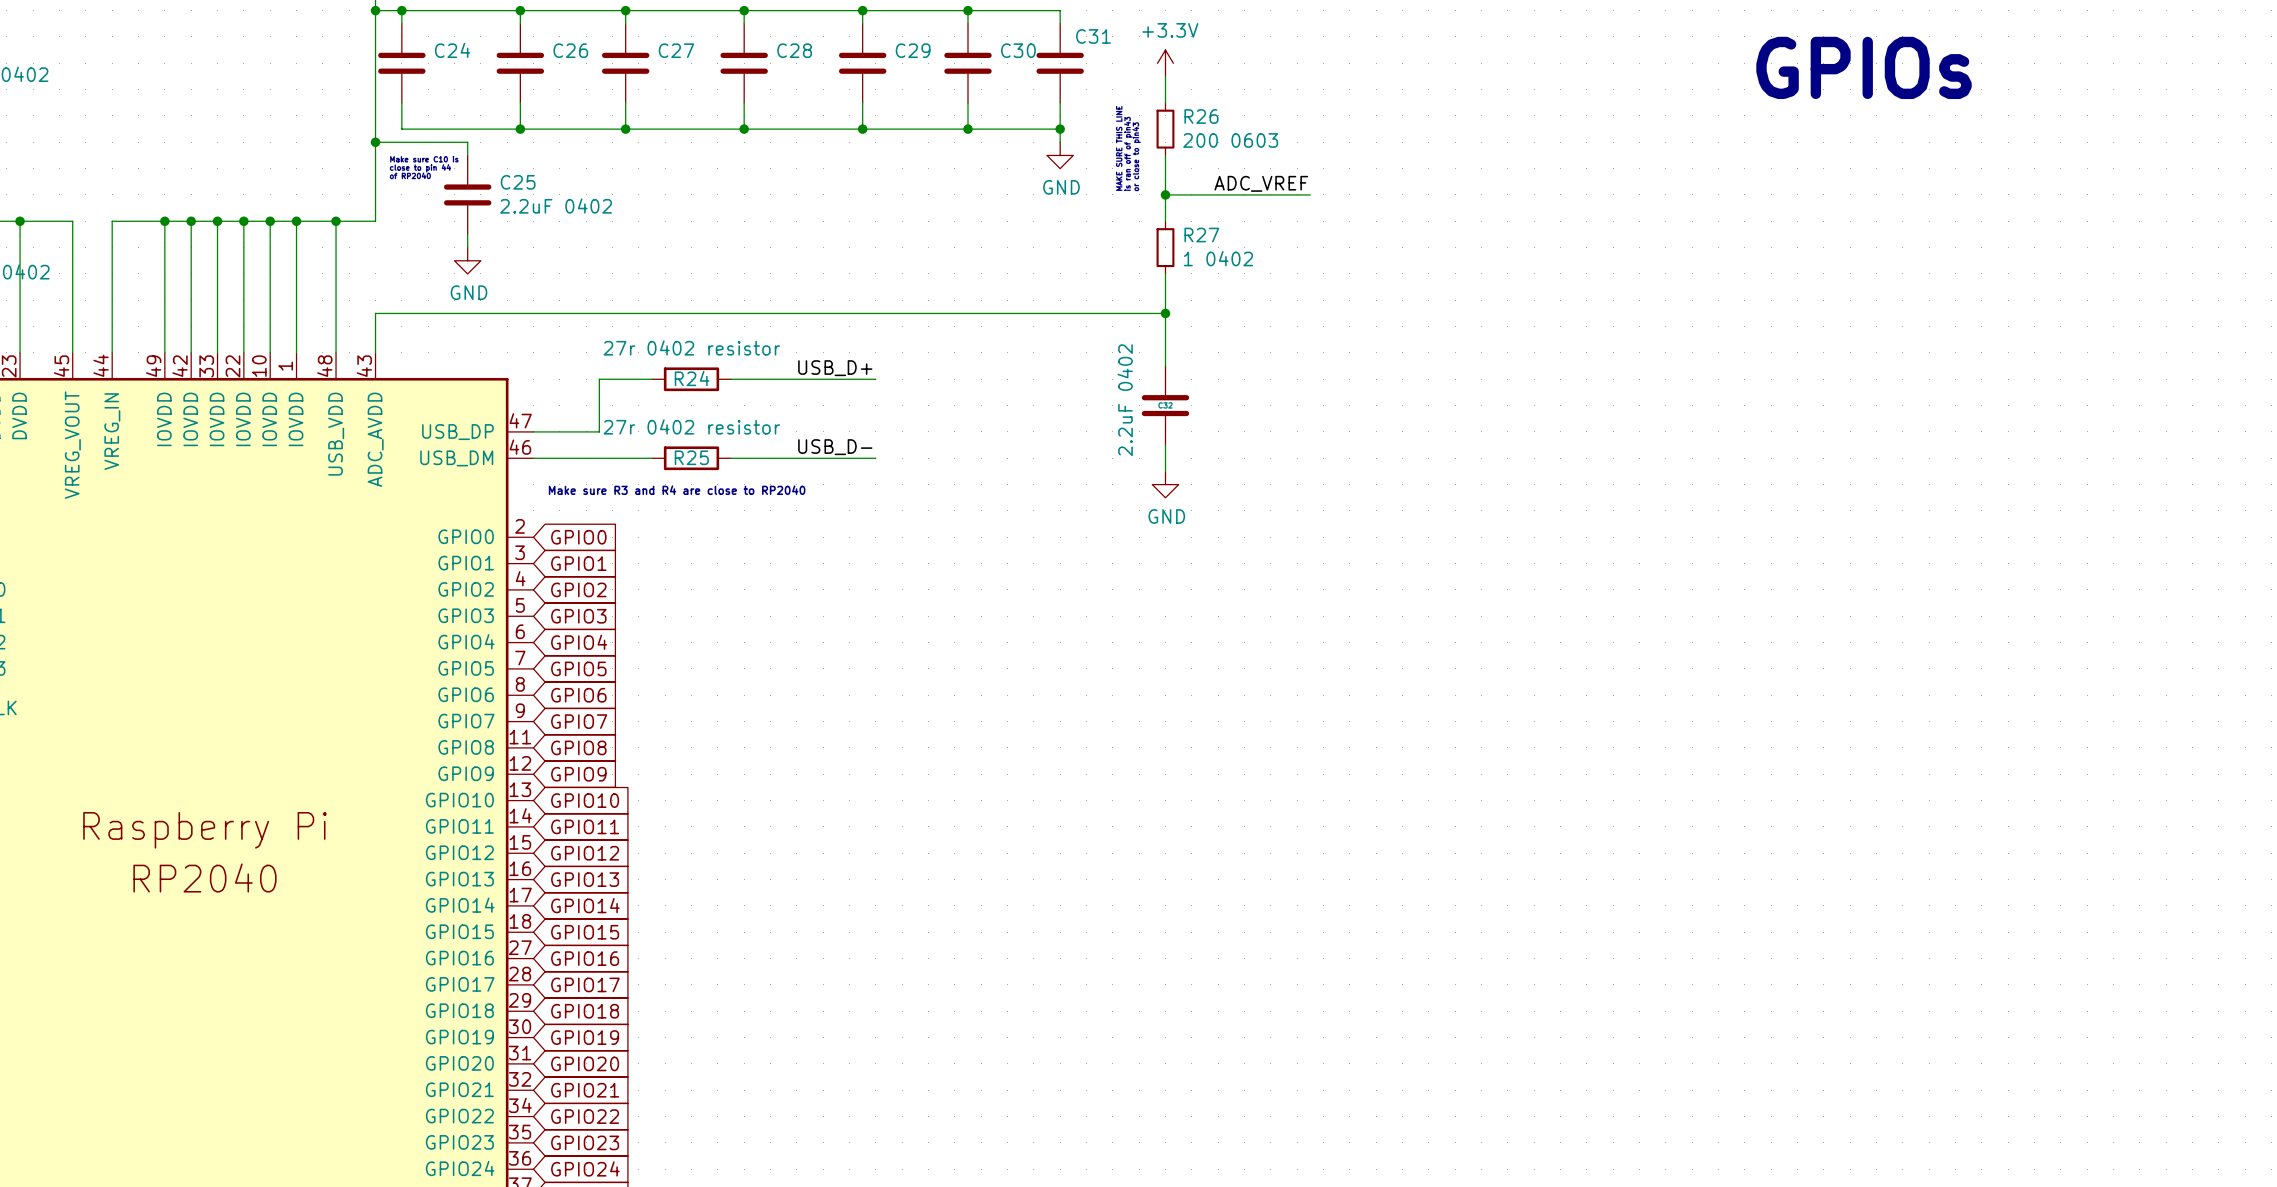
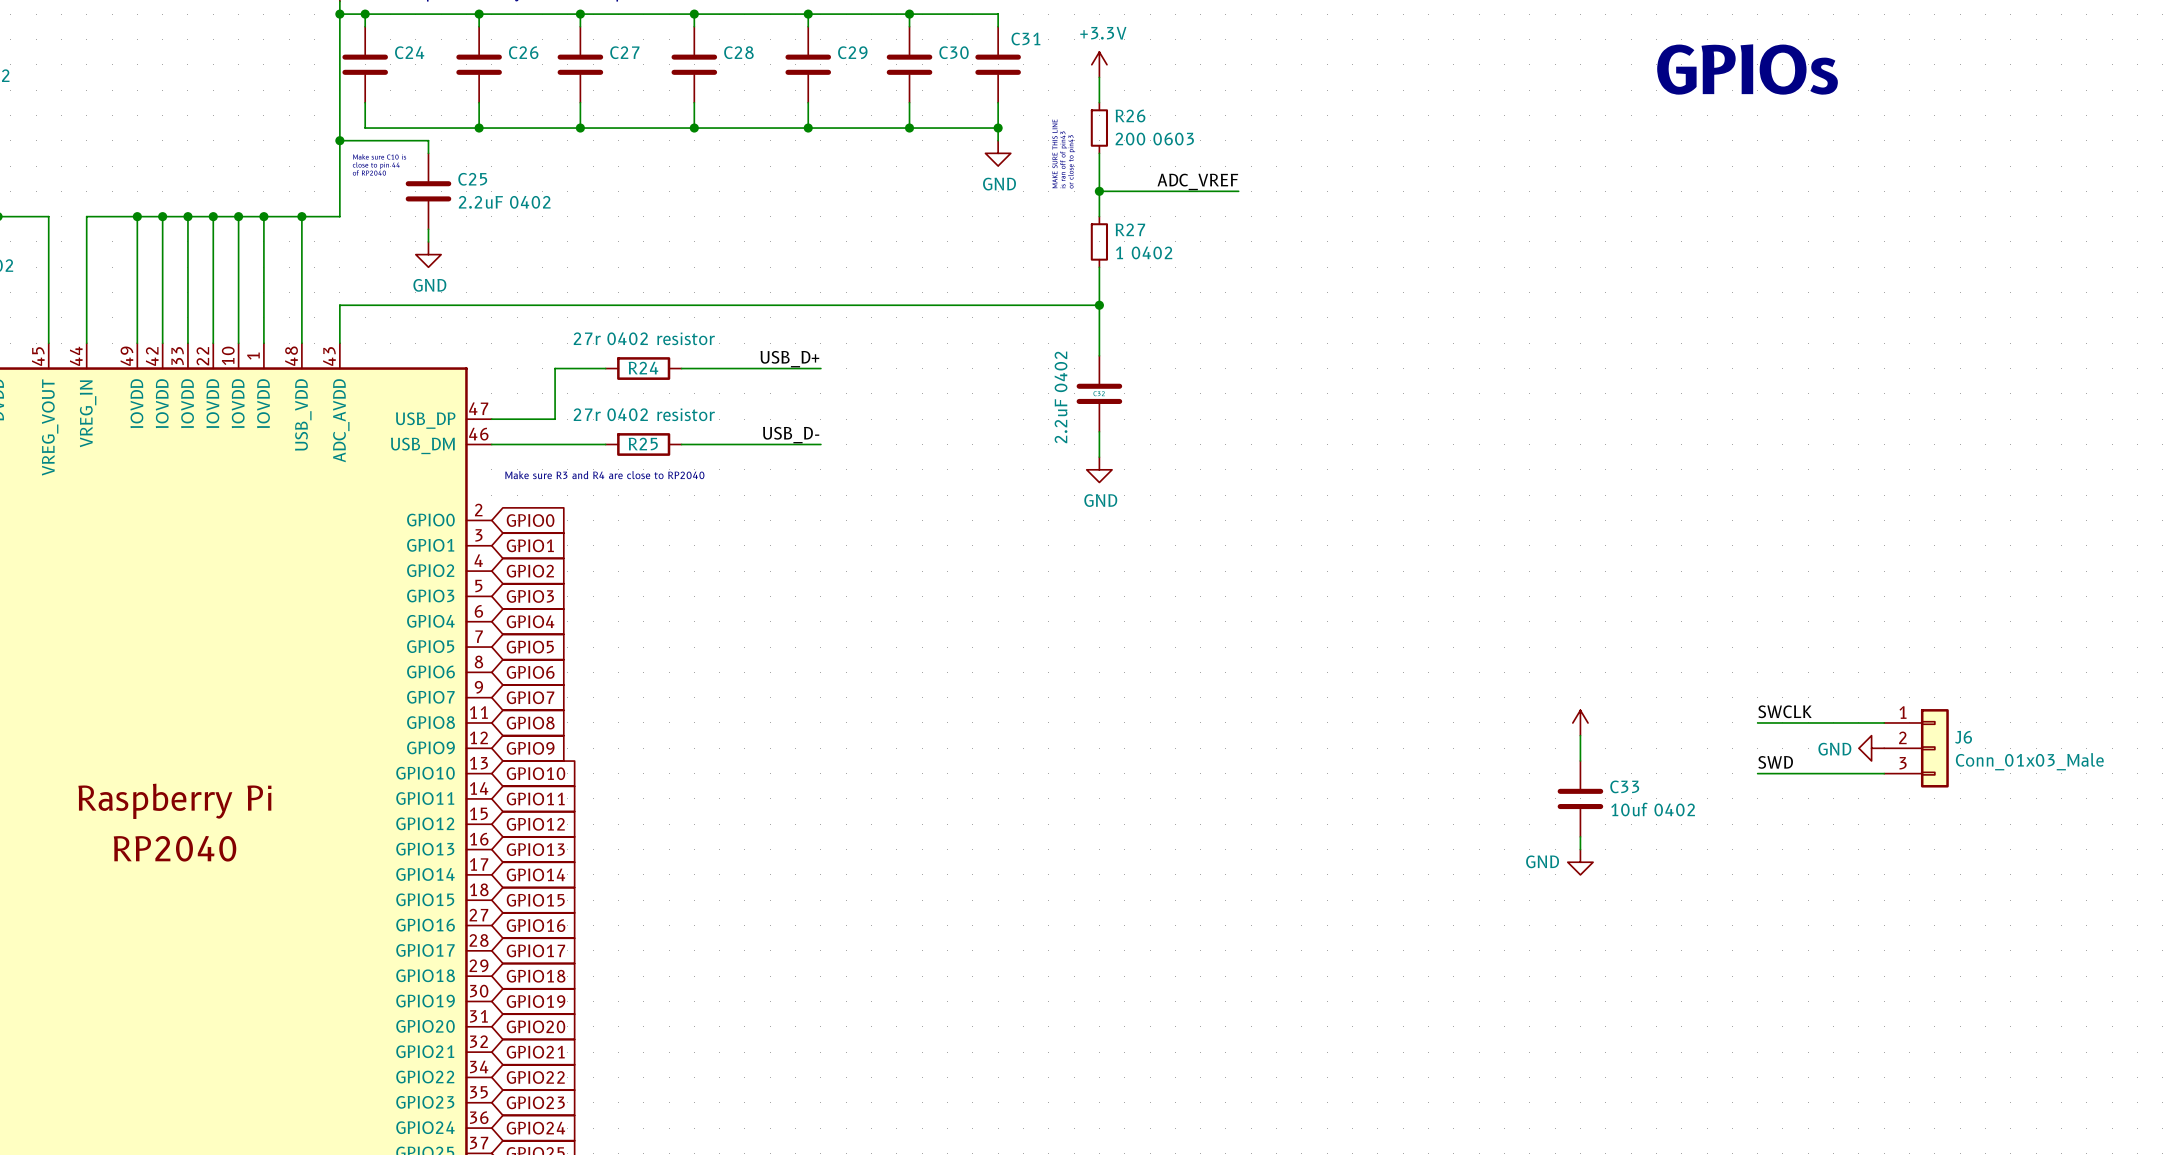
label: none -> SWCLK (1785, 711)
power symbol: none -> (1580, 722)
wire: none -> (1757, 722) (1884, 722)
wire: none -> (1580, 735) (1580, 760)
power symbol: none -> GND (1871, 748)
J6: none -> Conn_01x03_Male (1916, 748)
label: none -> SWD (1775, 762)
wire: none -> (1757, 773) (1884, 773)
C33: none -> 10uf 0402 (1580, 798)
wire: none -> (1580, 836) (1580, 849)
power symbol: none -> GND (1580, 862)

